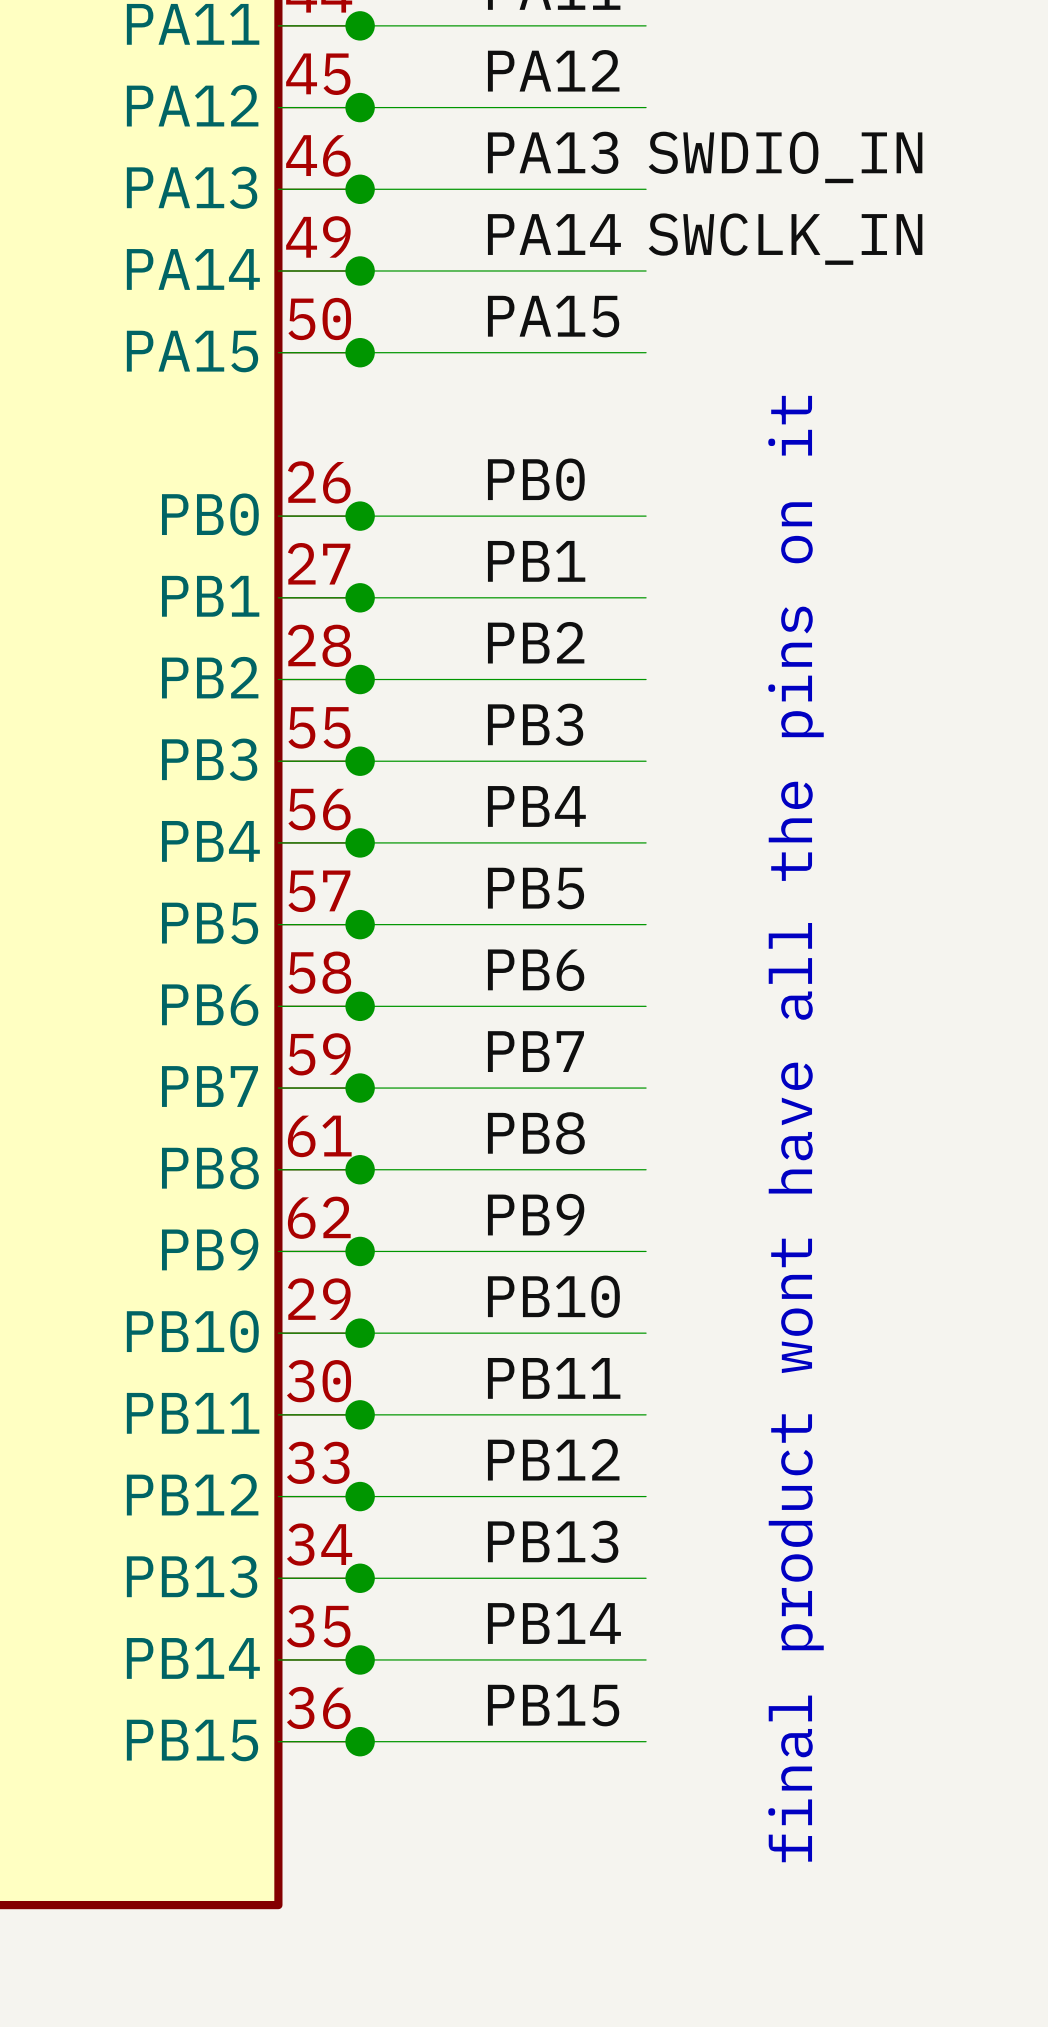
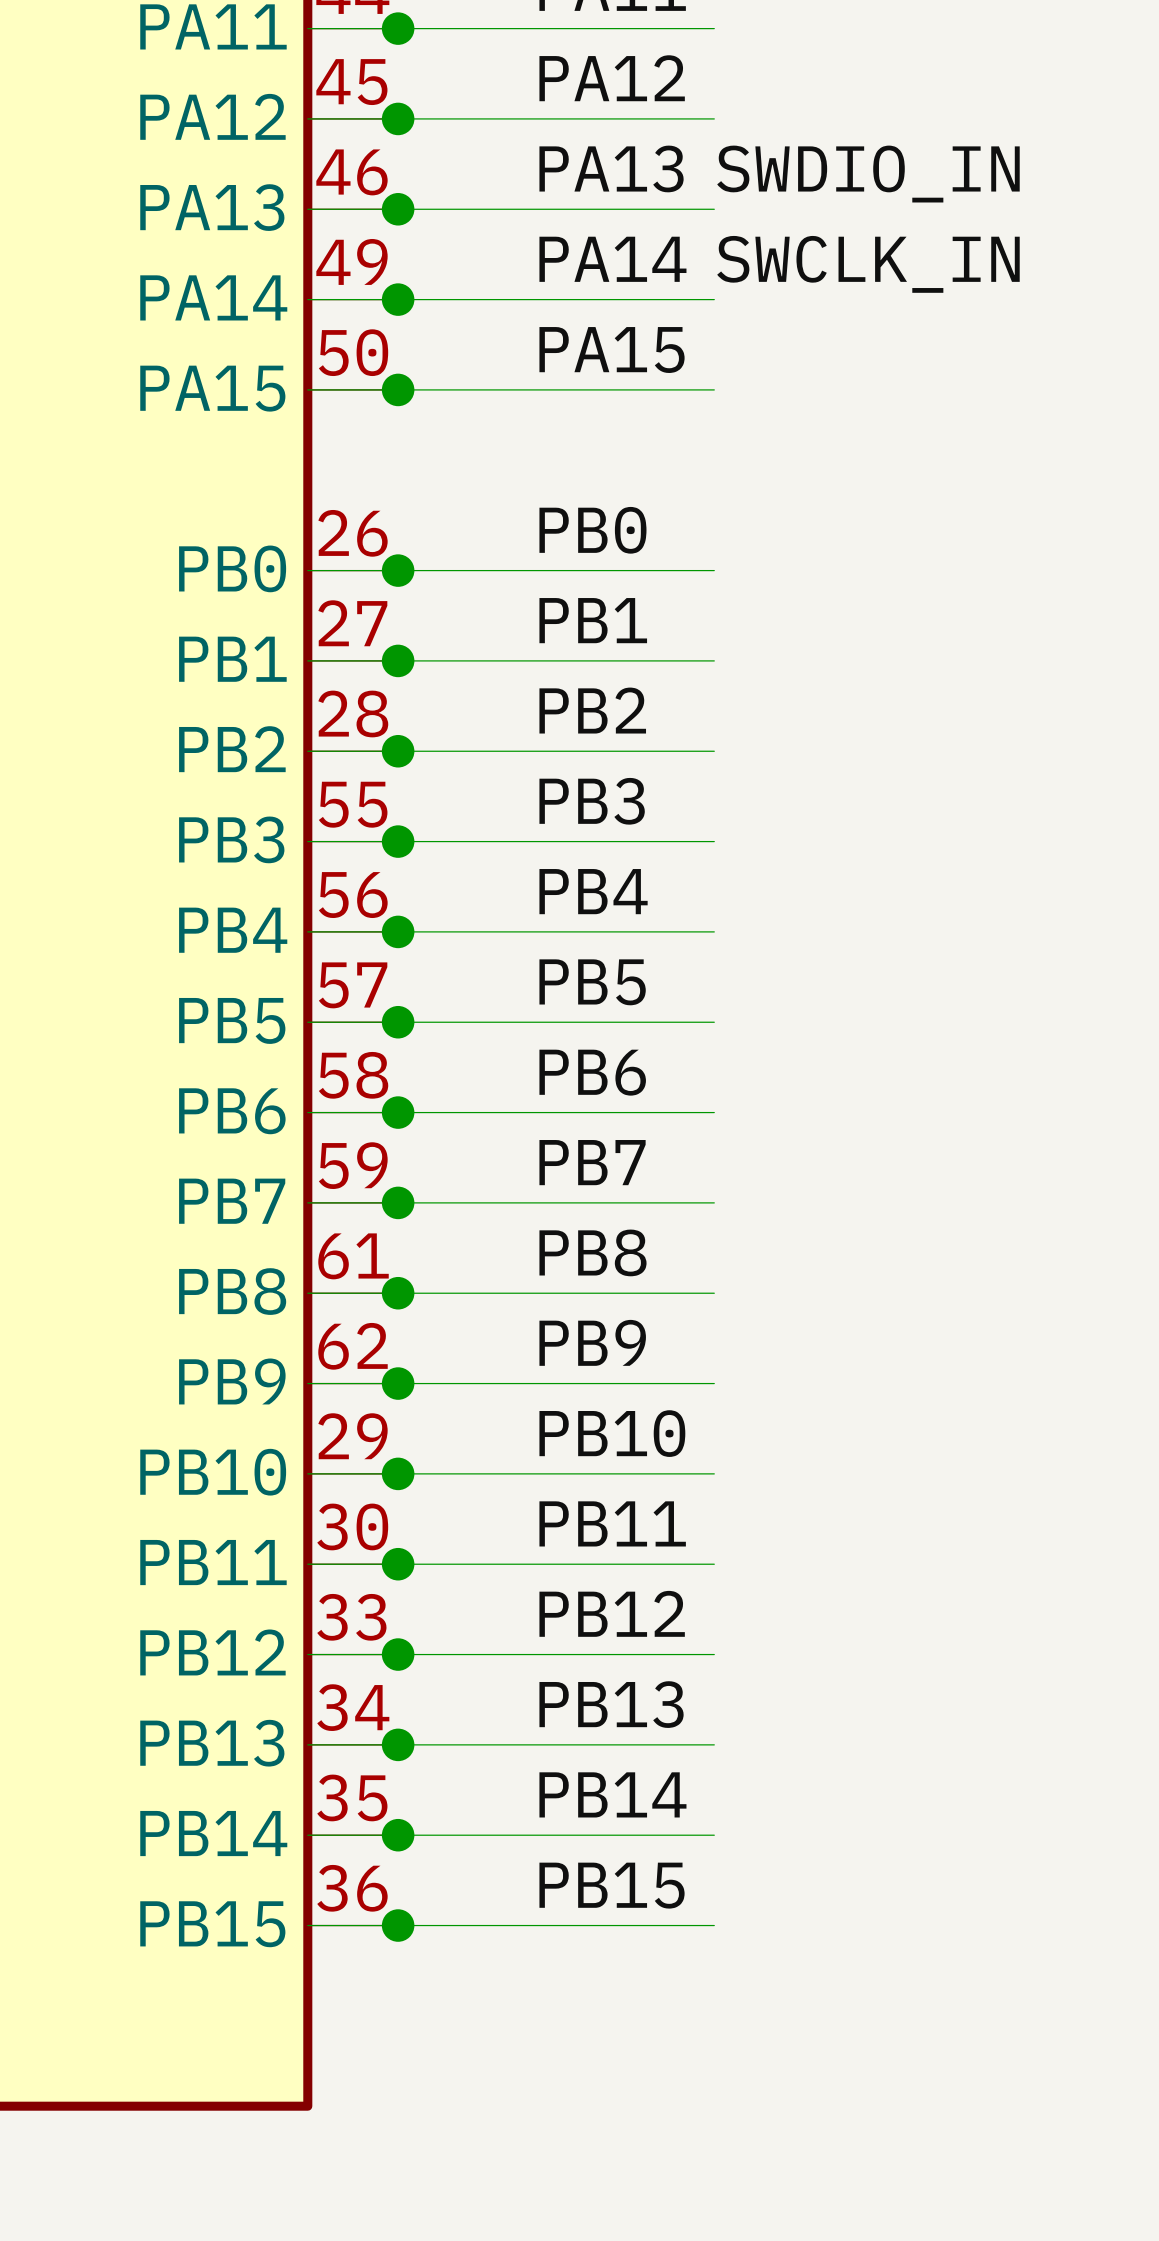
text: final product wont have all the pins on it (796, 1129) -> none

